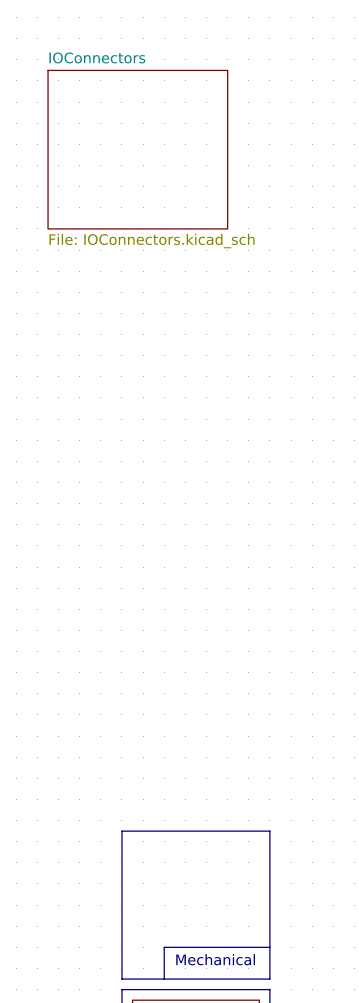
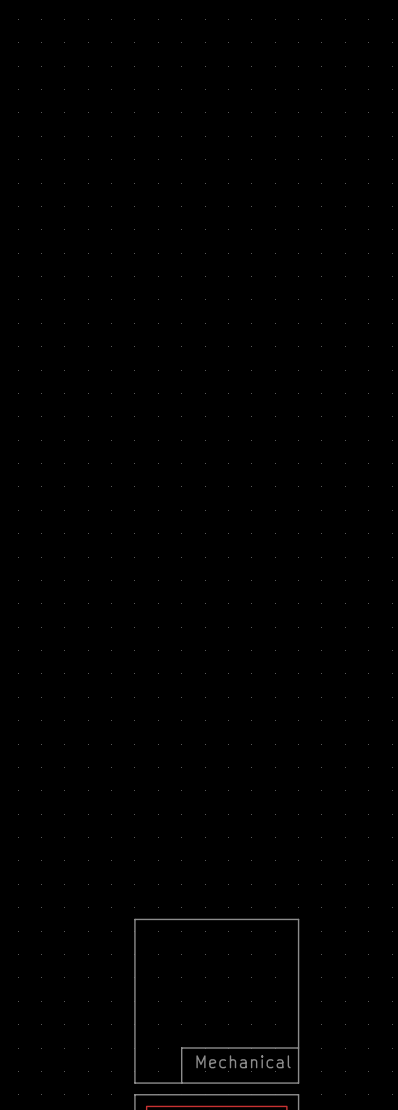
sheet IOConnectors: File: IOConnectors.kicad_sch (137, 149) -> none

